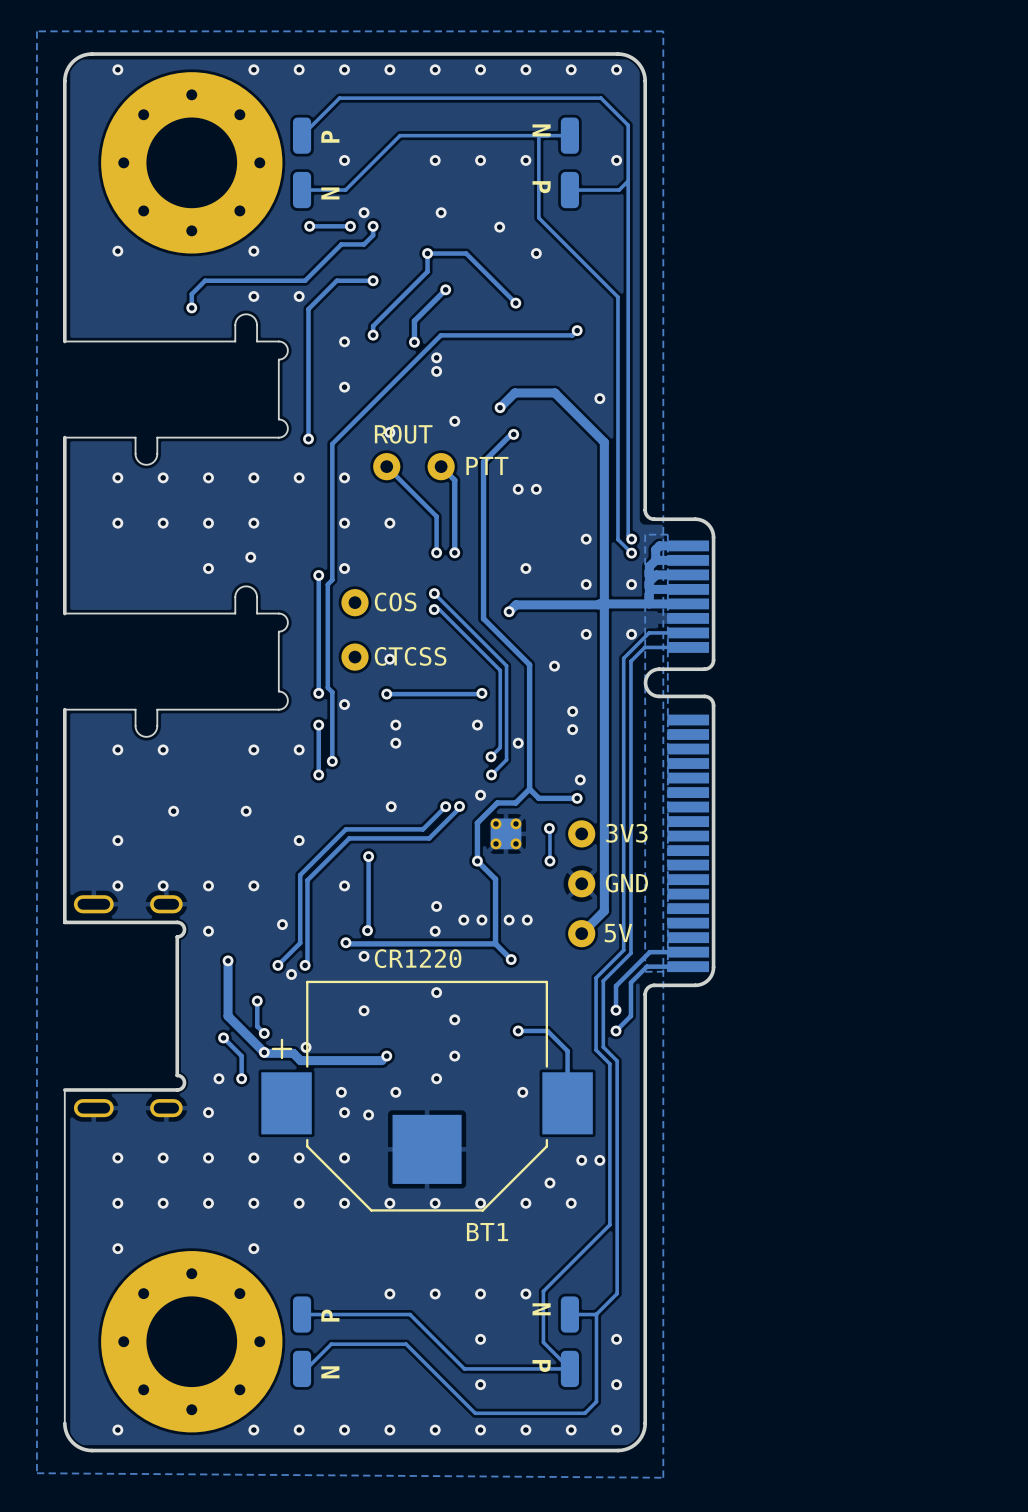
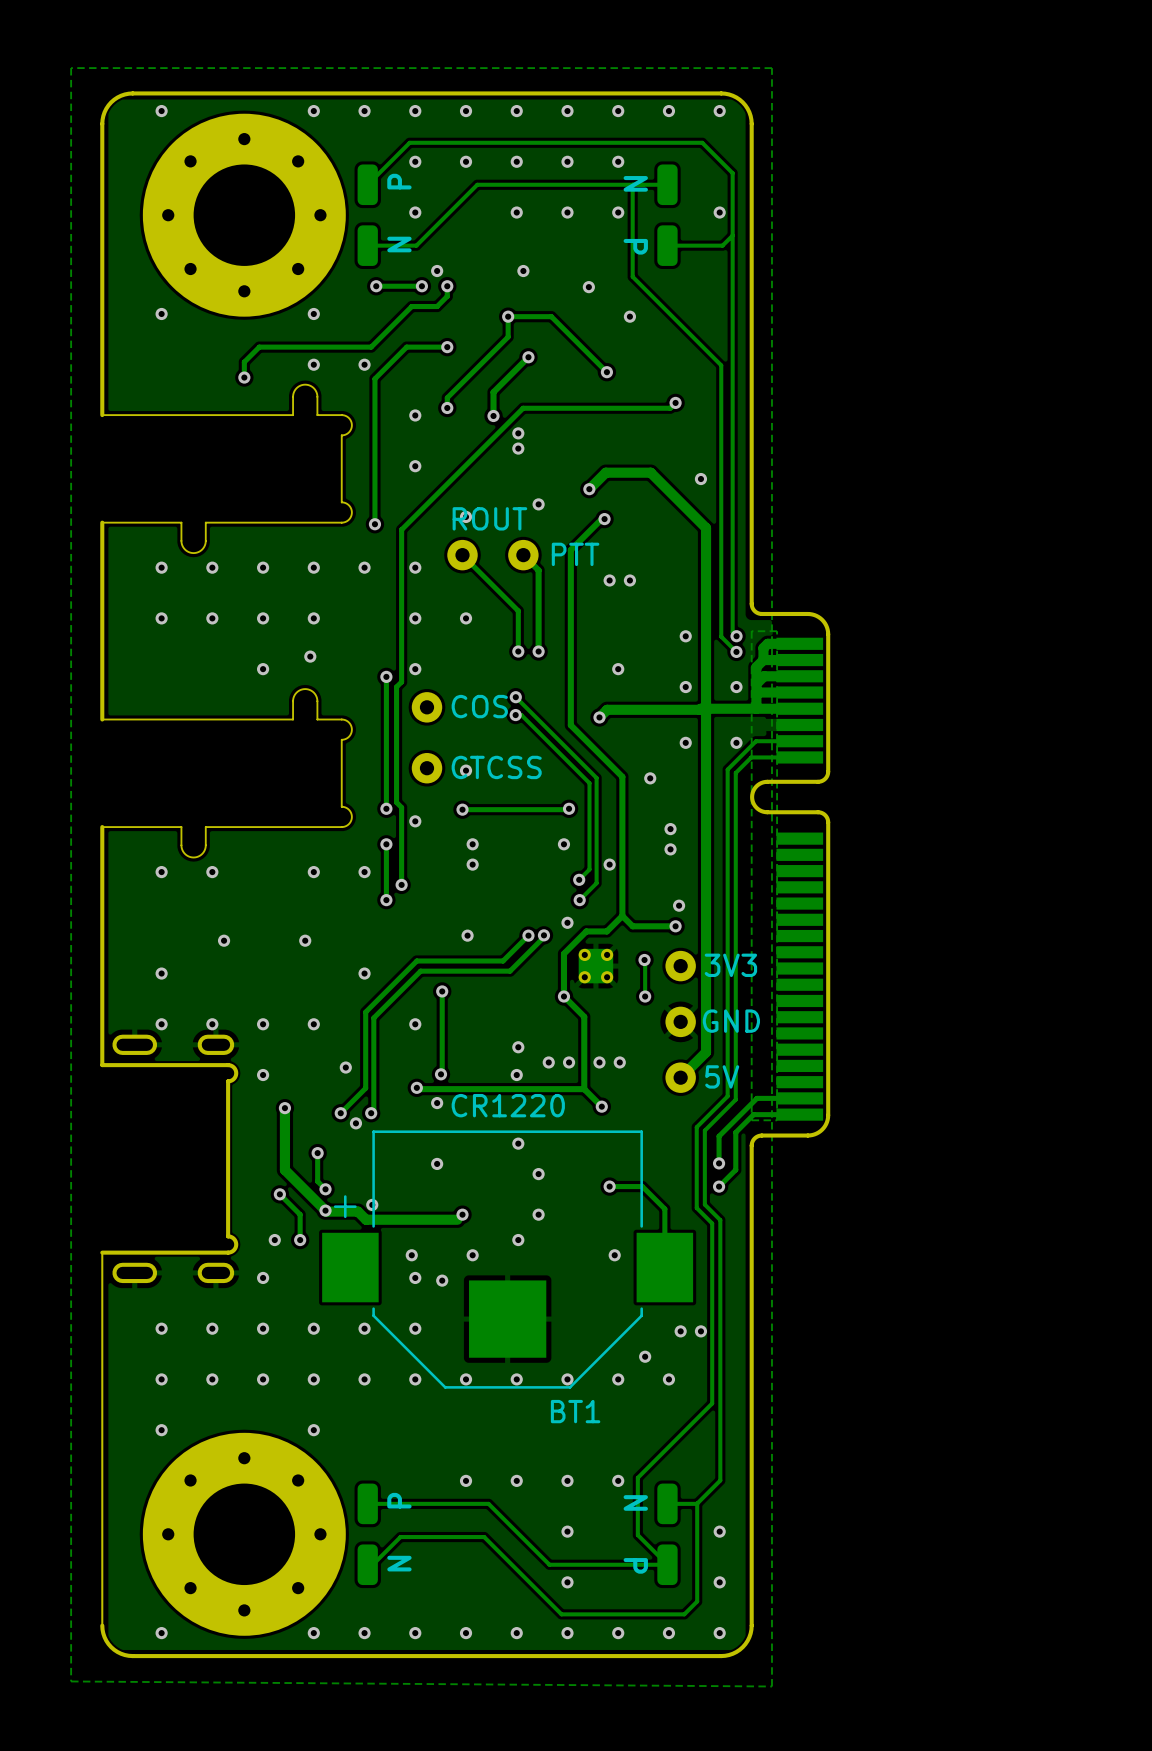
via: none -> (415, 161)
via: none -> (466, 161)
via: none -> (516, 161)
via: none -> (567, 161)
via: none -> (618, 161)

